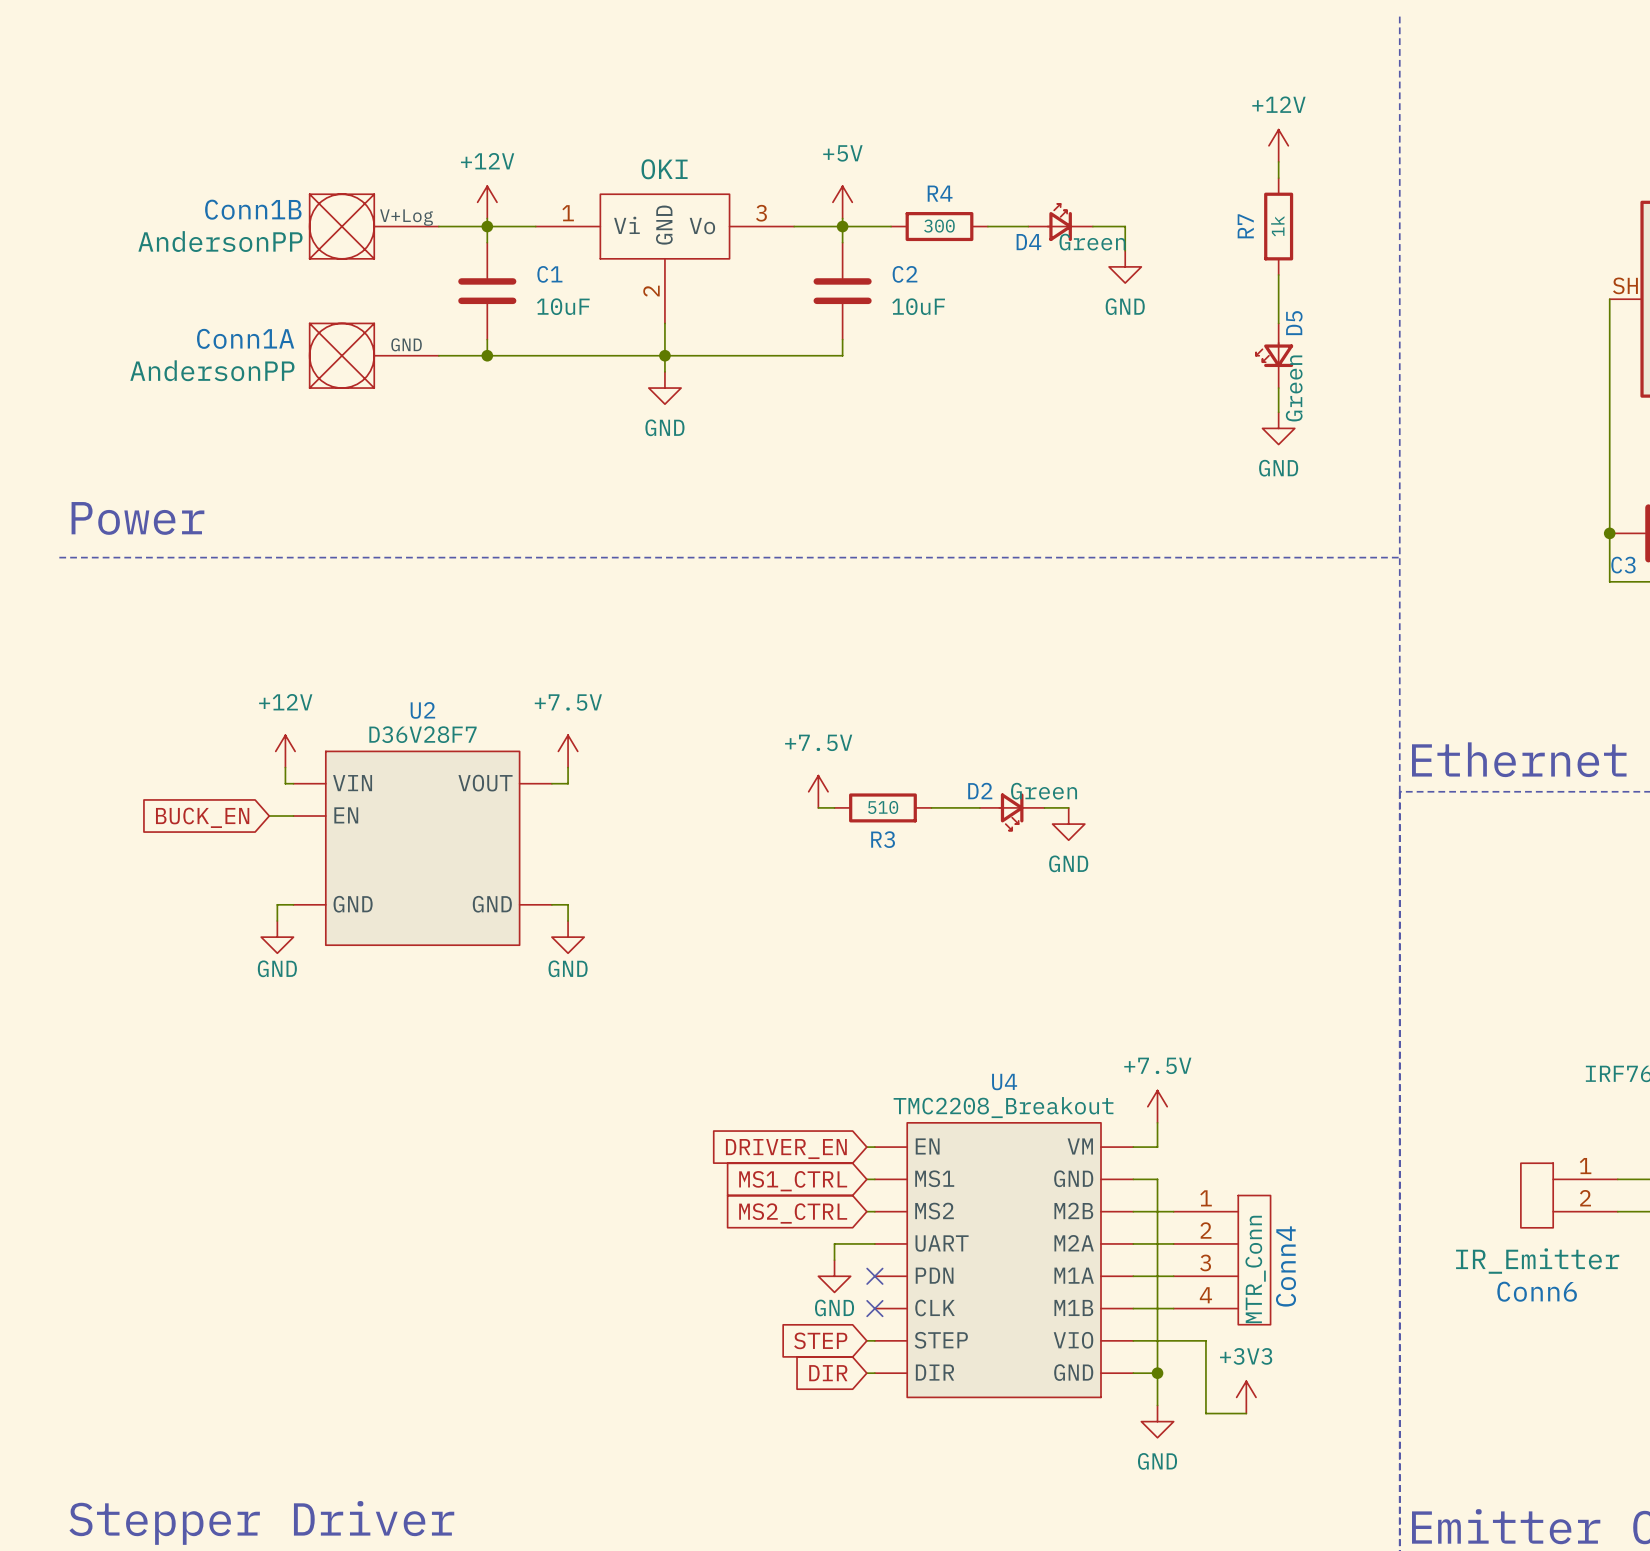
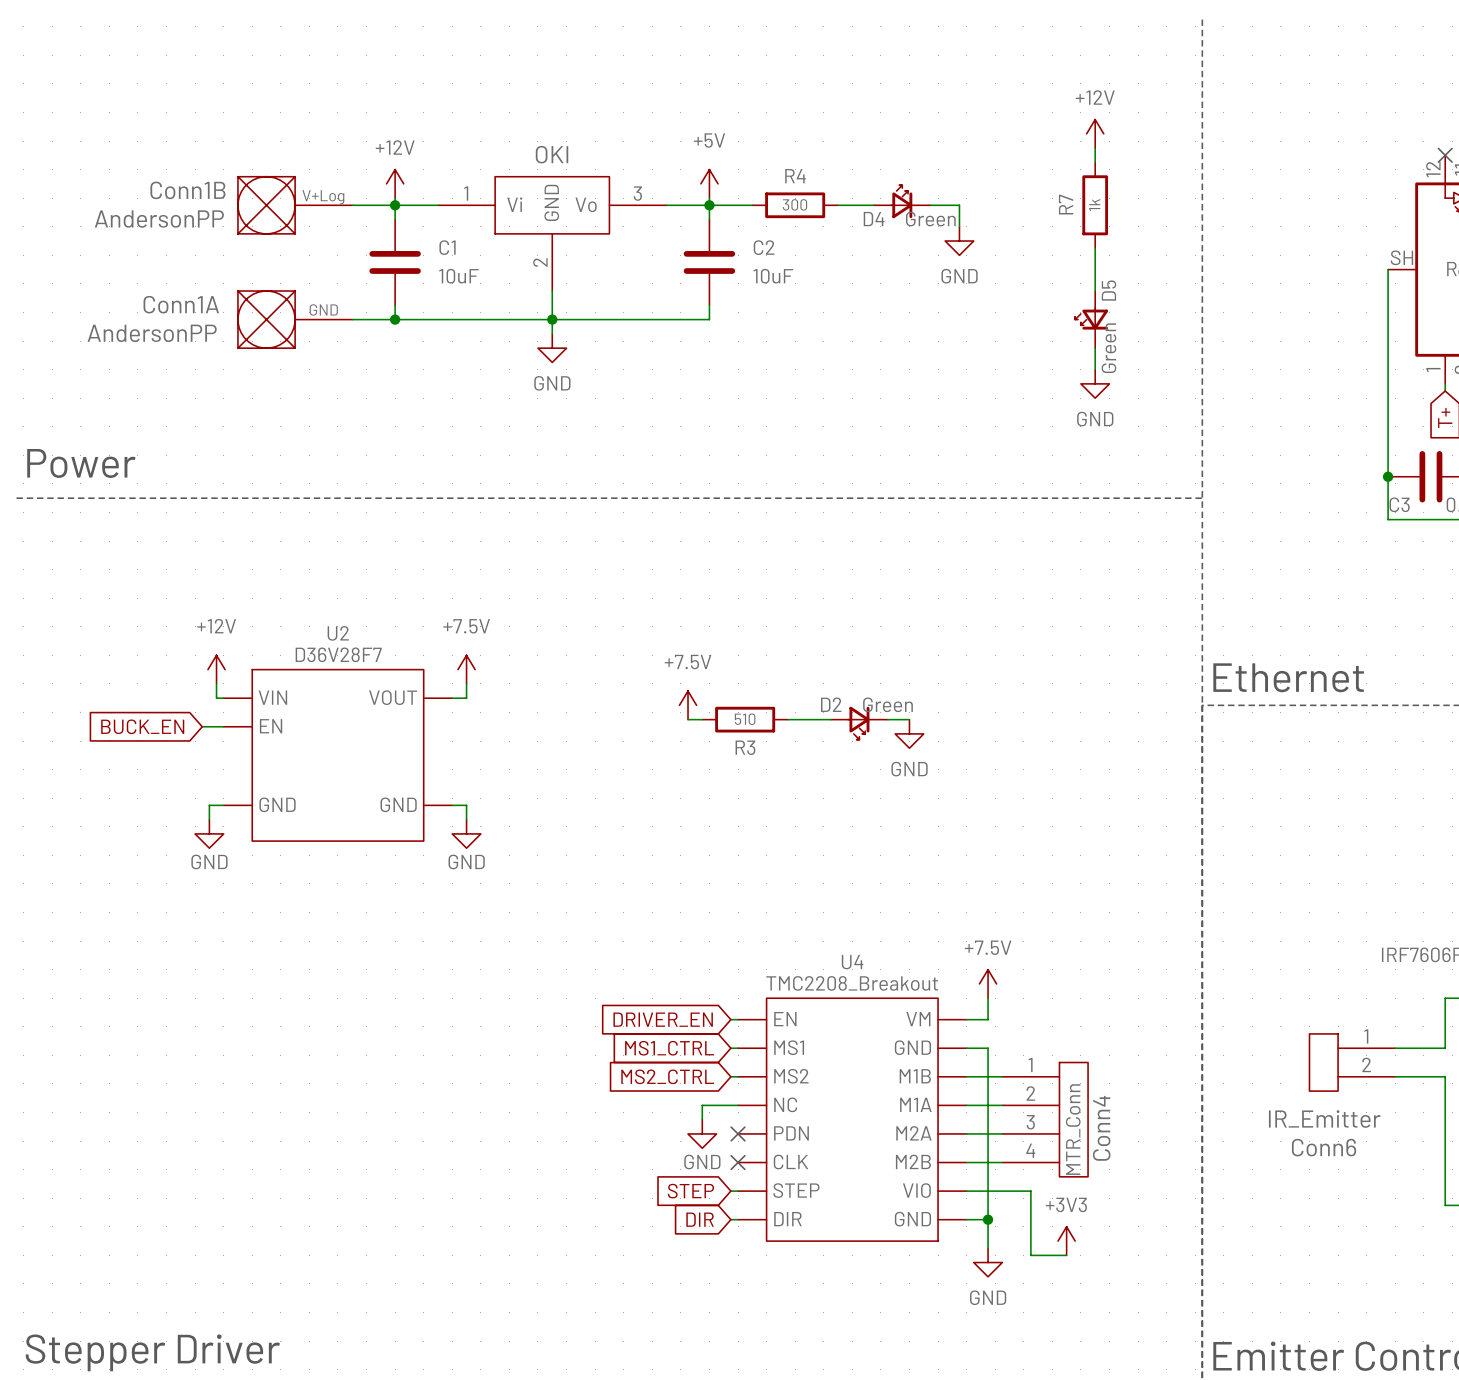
U4 pin name: M2B (1073, 1210) -> M1B (915, 1076)
U4 pin name: UART (942, 1243) -> NC (785, 1104)
U4 pin name: M2A (1074, 1243) -> M1A (915, 1104)
U4 pin name: M1A (1074, 1275) -> M2A (913, 1133)
U4 pin name: M1B (1073, 1307) -> M2B (913, 1161)

